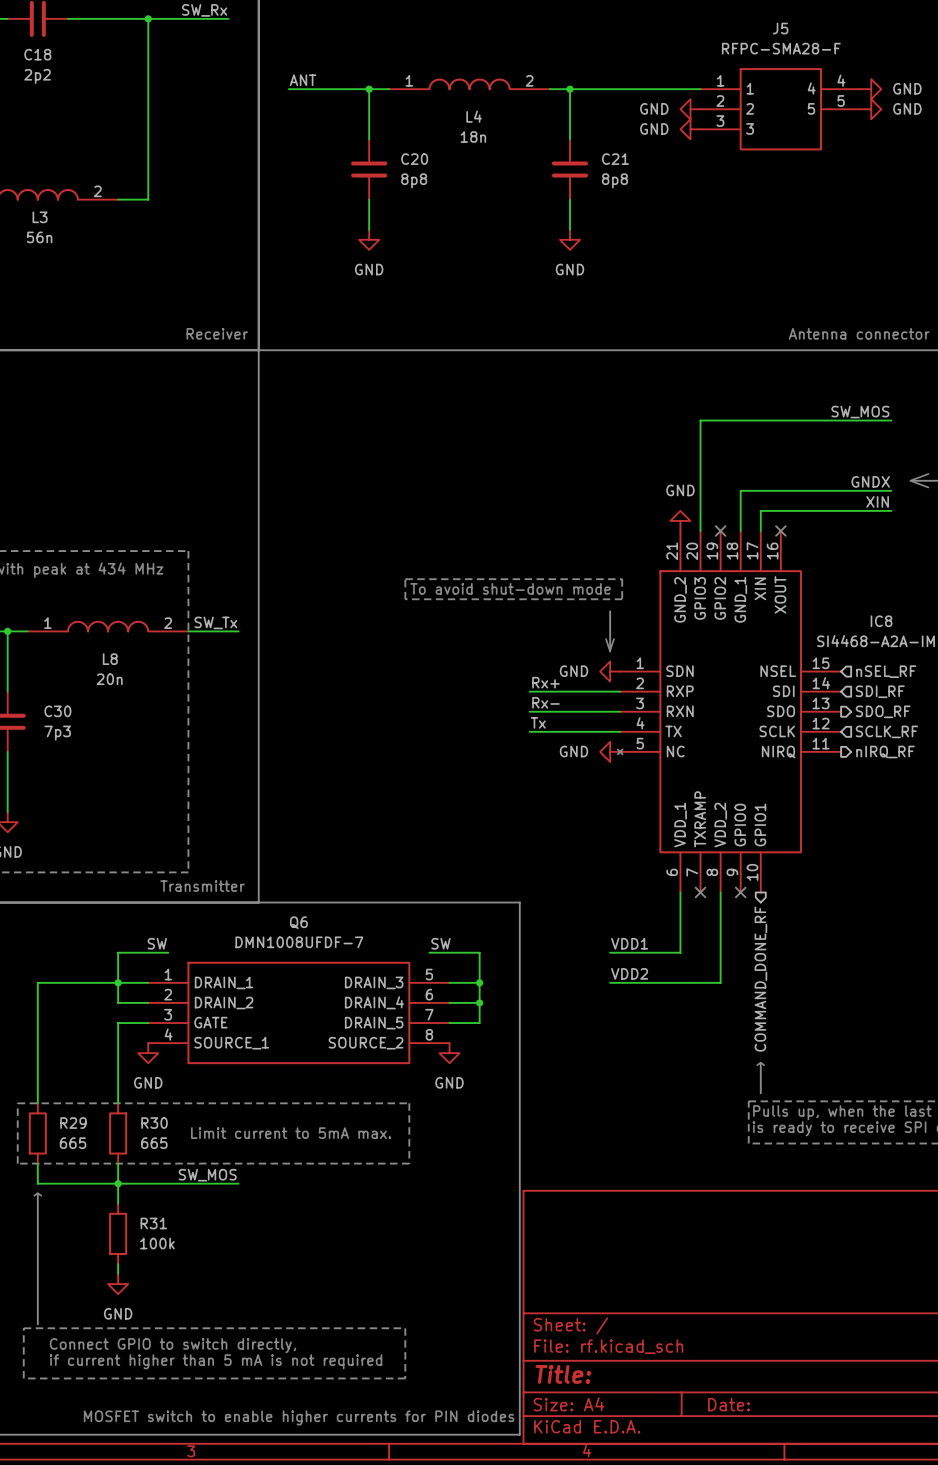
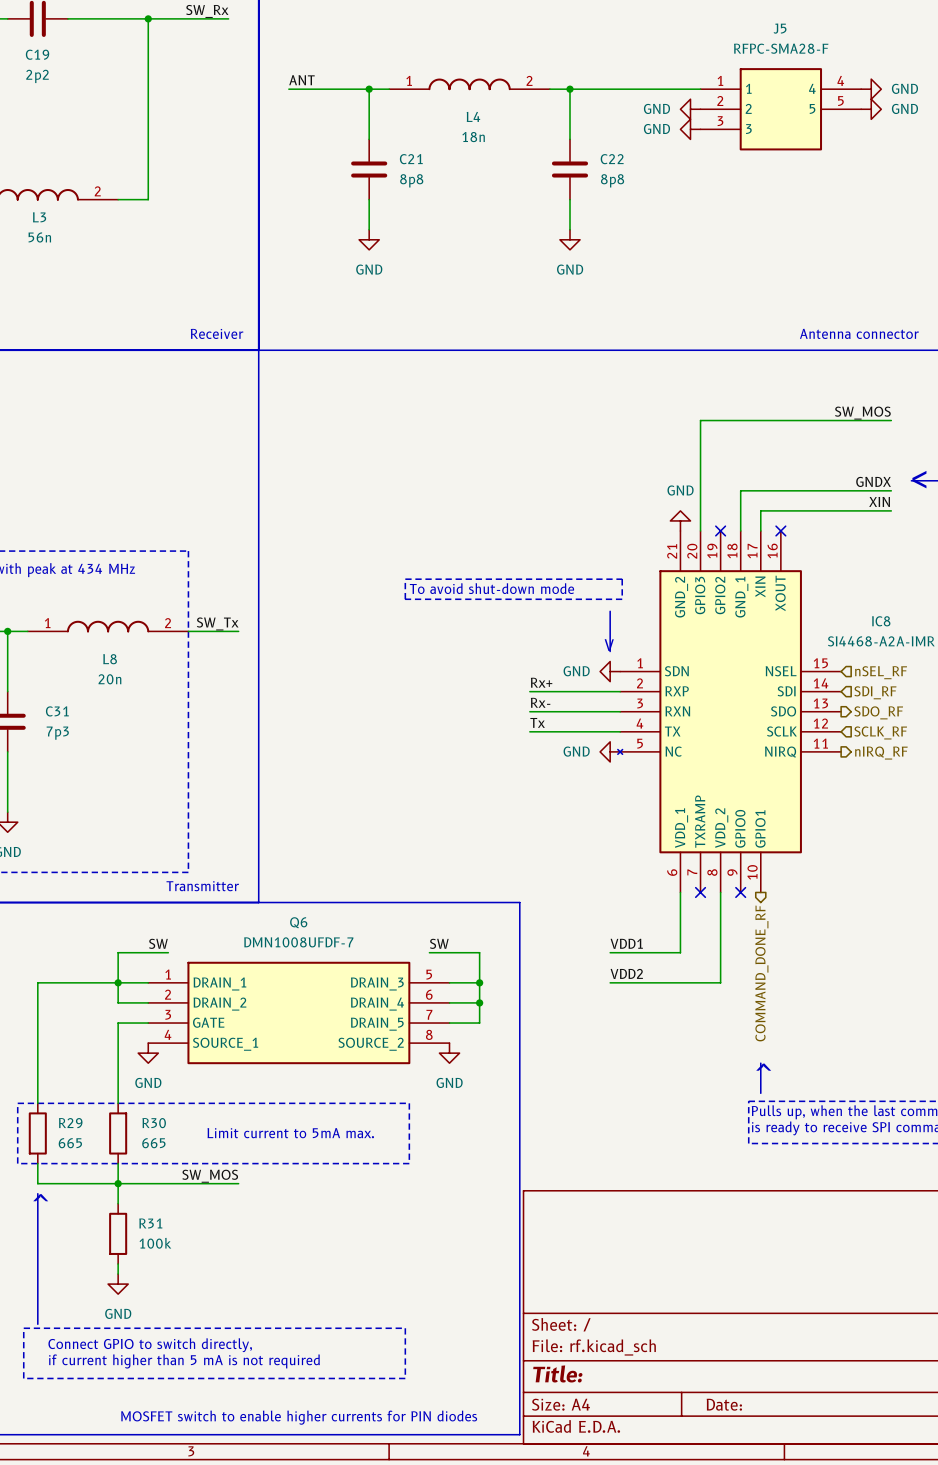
C18 name: C18 (37, 54) -> C19 (37, 54)
C20 name: C20 (414, 159) -> C21 (411, 159)
C21 name: C21 (615, 159) -> C22 (612, 159)
C30 name: C30 (57, 711) -> C31 (57, 711)

